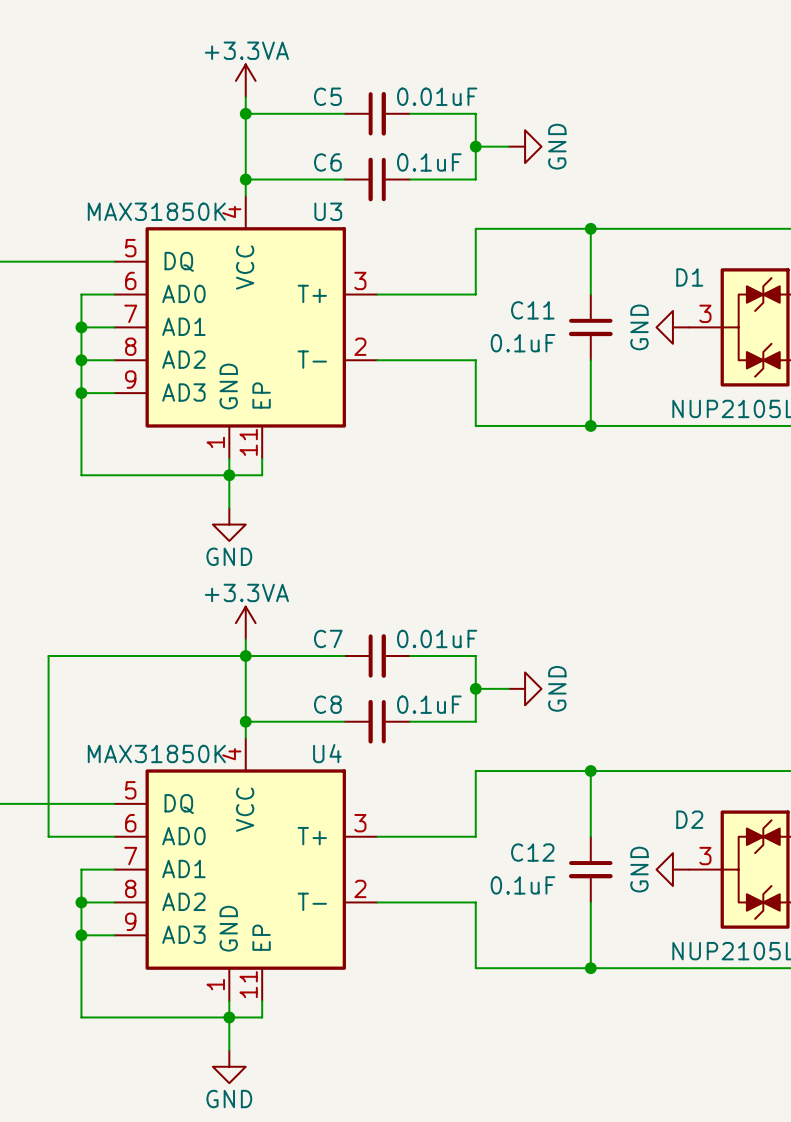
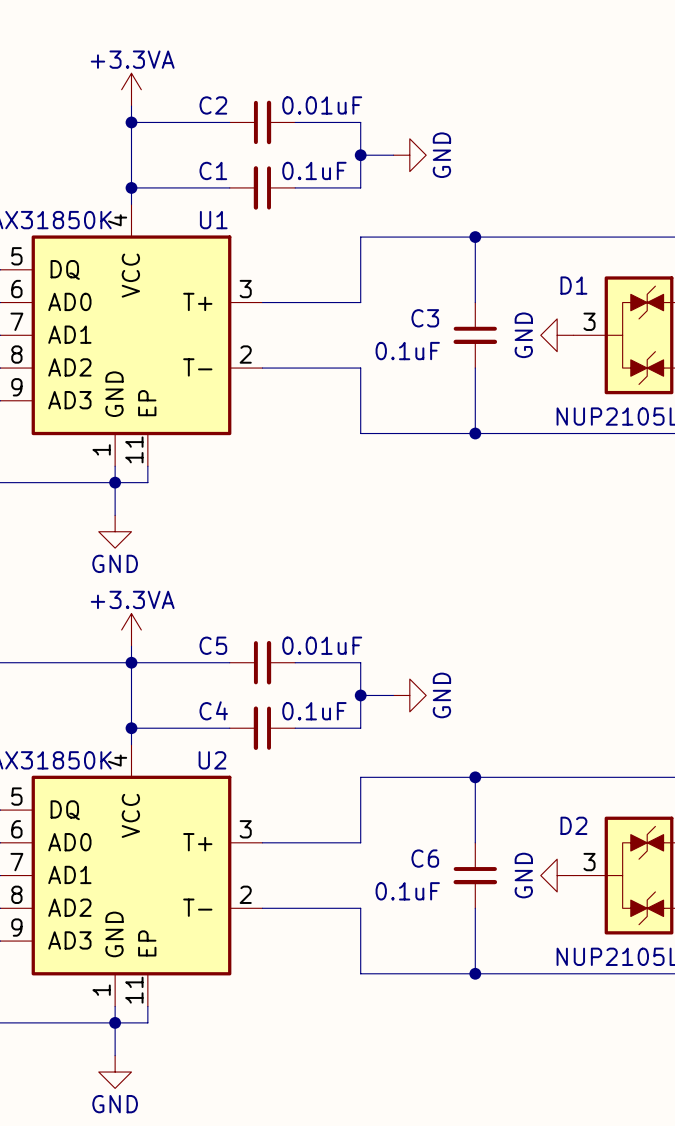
C5 name: C5 (327, 96) -> C2 (213, 105)
C6 name: C6 (327, 162) -> C1 (213, 170)
U3 name: U3 (328, 211) -> U1 (213, 220)
C11 name: C11 (532, 310) -> C3 (425, 318)
C7 name: C7 (328, 638) -> C5 (213, 645)
C8 name: C8 (327, 704) -> C4 (213, 710)
U4 name: U4 (327, 753) -> U2 (212, 760)
C12 name: C12 (532, 852) -> C6 (425, 858)

